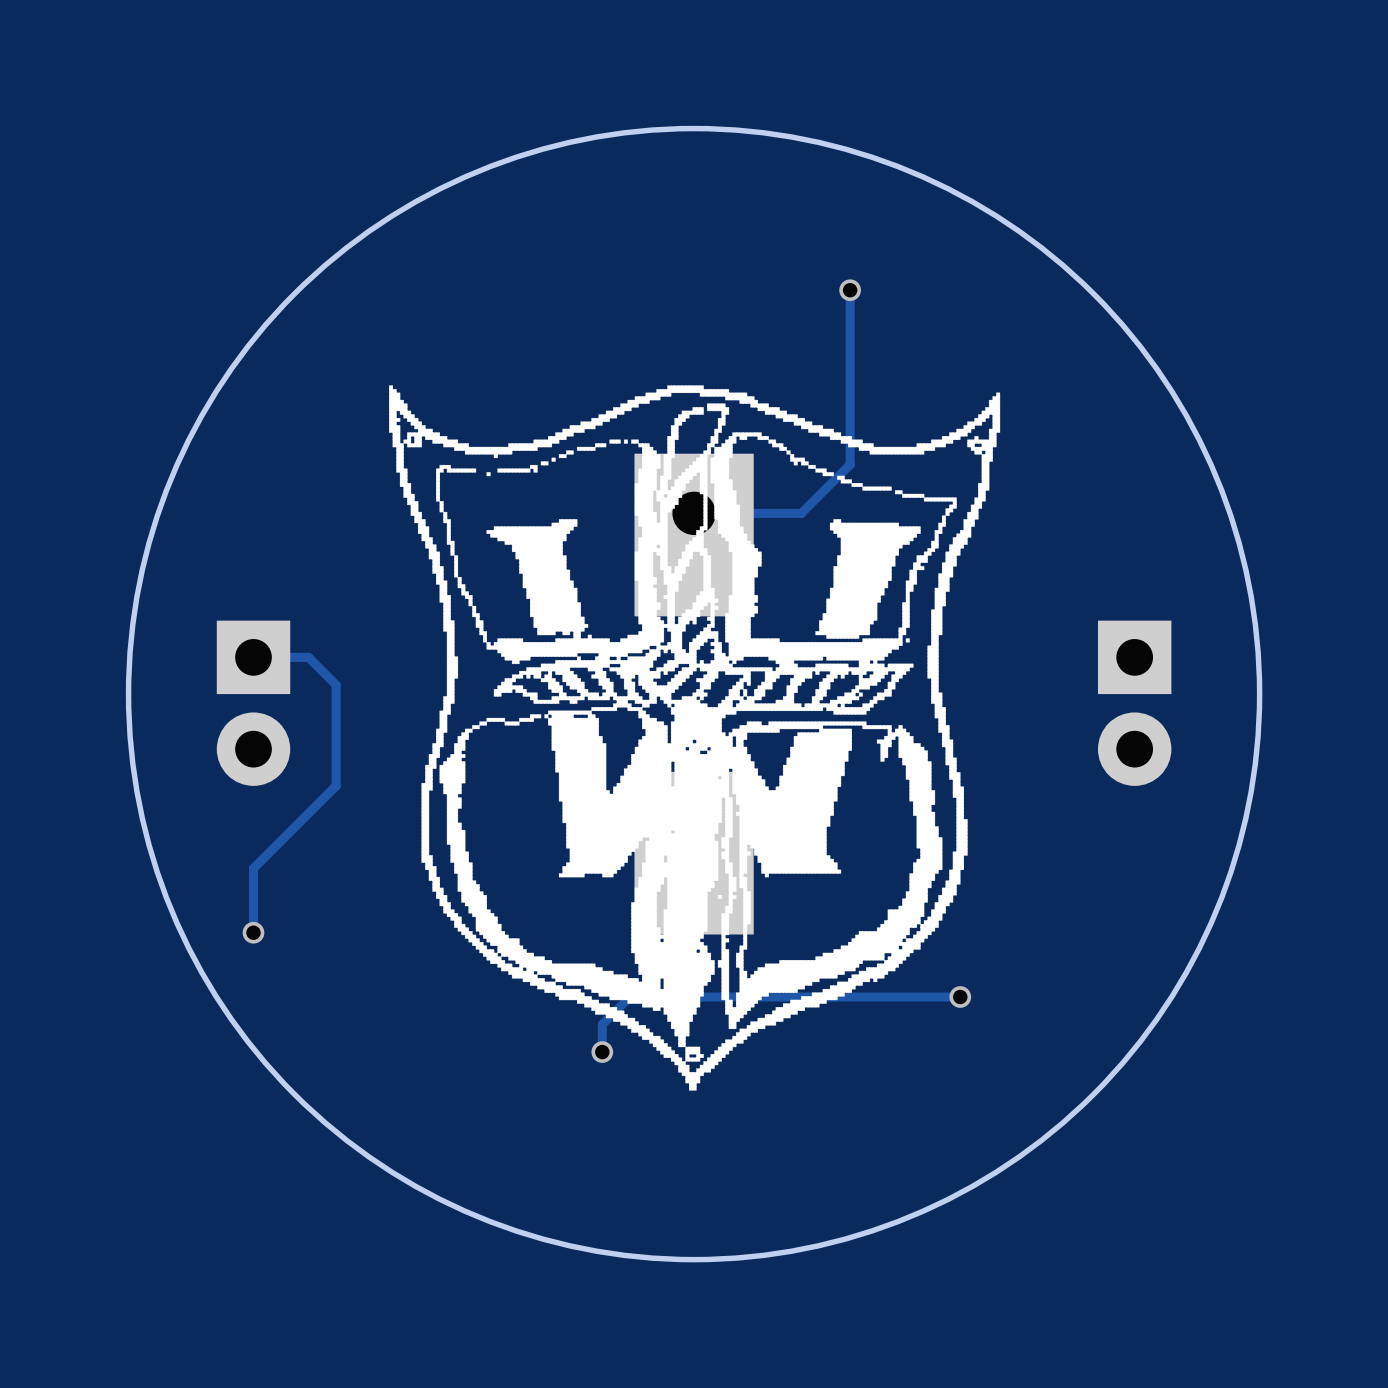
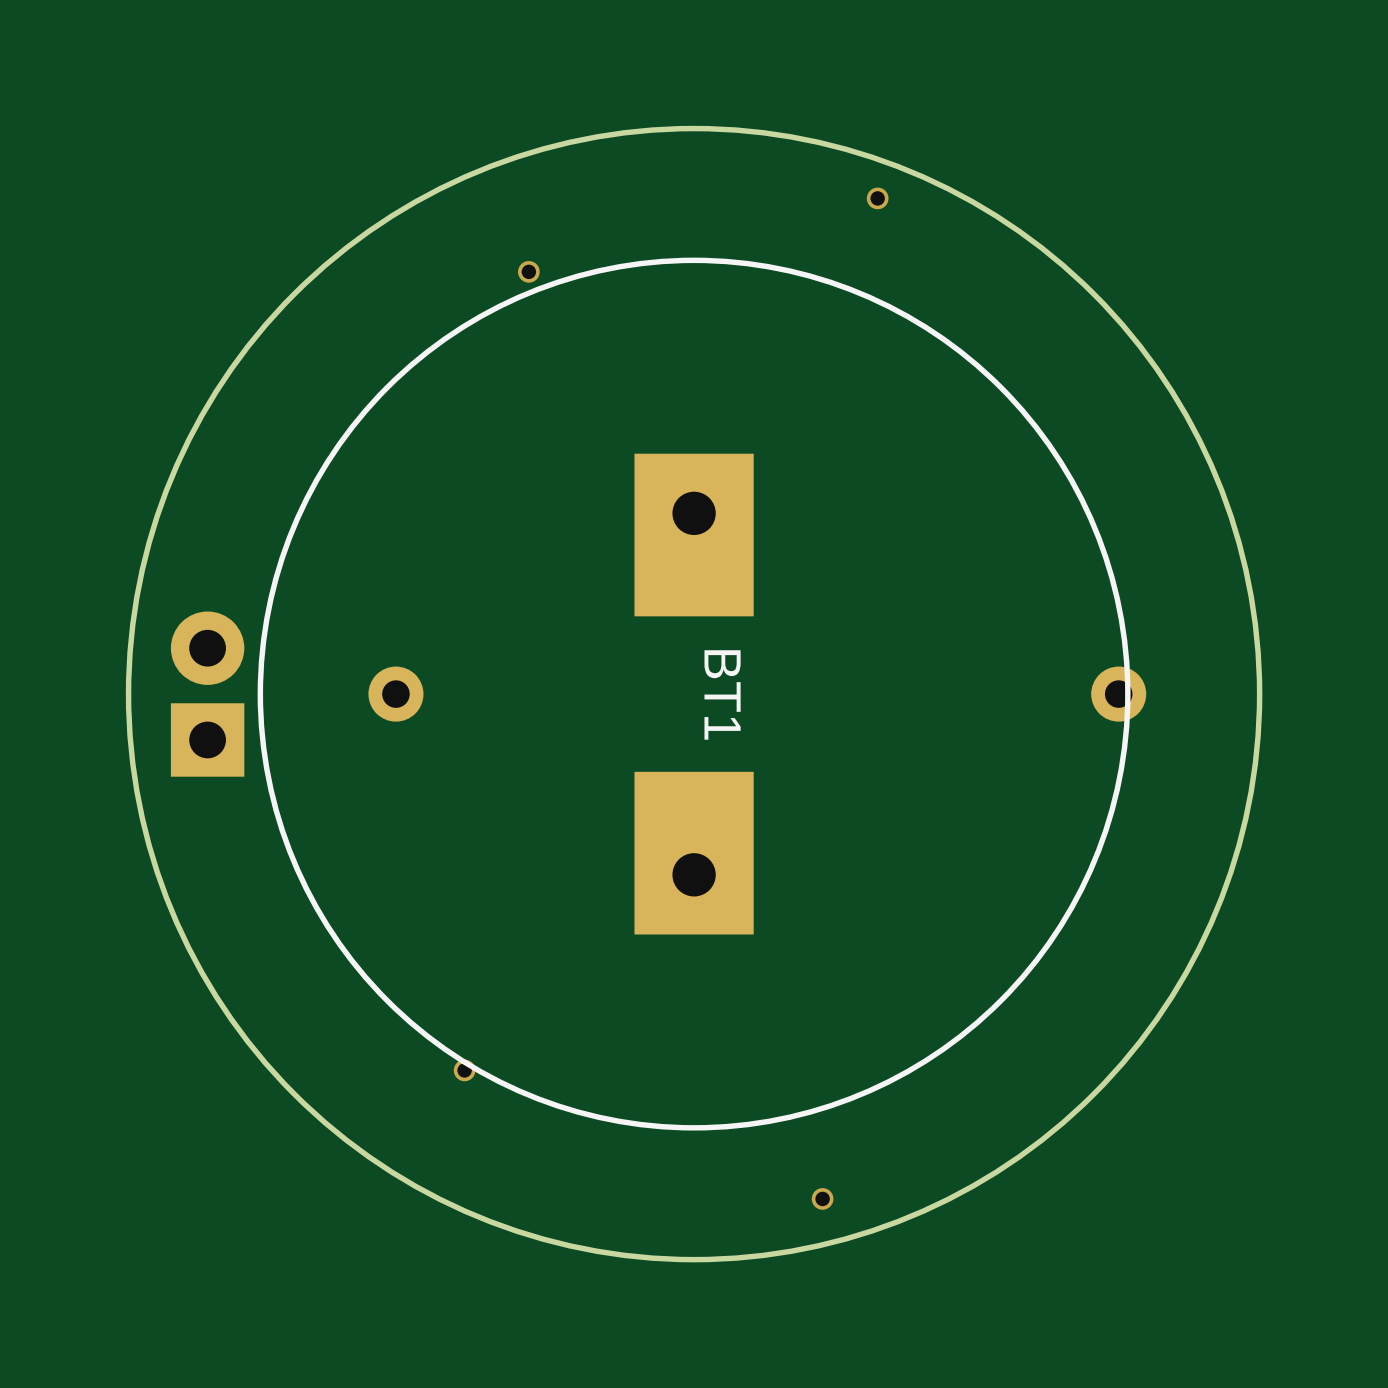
via: none -> (528, 271)
track: (850, 290) (850, 464) (801, 513) (694, 513) -> none
via position: (850, 290) -> (877, 198)
drawing: [389, 385, 1001, 1091] -> none
track: (253, 657) (308, 657) (336, 684) (336, 785) (253, 868) (253, 932) -> none
BT1: none -> (701, 694)
part rotation: 0° (253, 703) -> 180° (207, 694)
part: (1134, 703) -> none
via: (253, 932) -> none
track: (960, 996) (629, 996) (602, 1024) (602, 1052) -> none
via: (960, 996) -> none
via: (602, 1052) -> none
via: none -> (464, 1070)
via: none -> (822, 1198)

